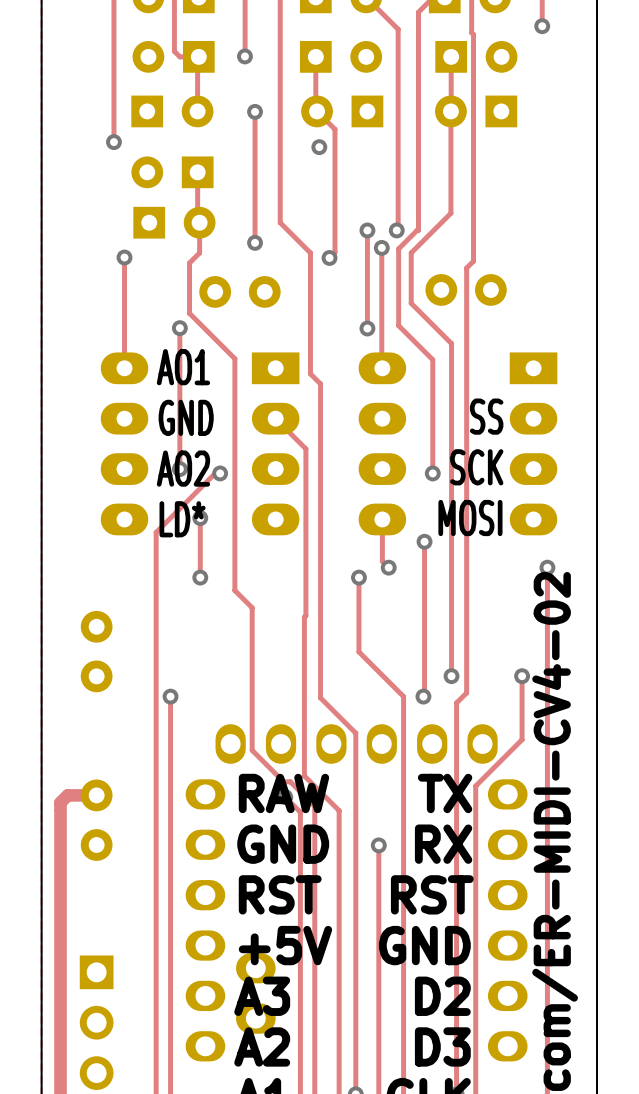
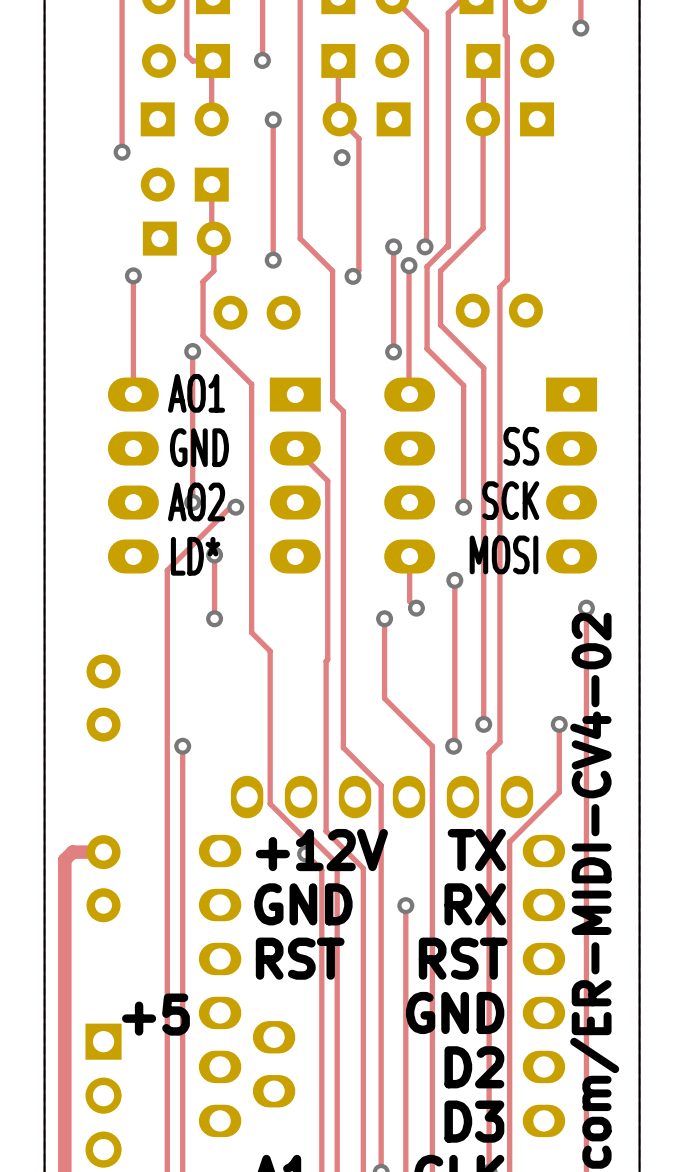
text: RAW (283, 793) -> +12V (321, 850)
text: +5V (285, 945) -> none
text: none -> +5 (155, 1014)
text: A3 (262, 996) -> none
text: A2 (262, 1046) -> none

